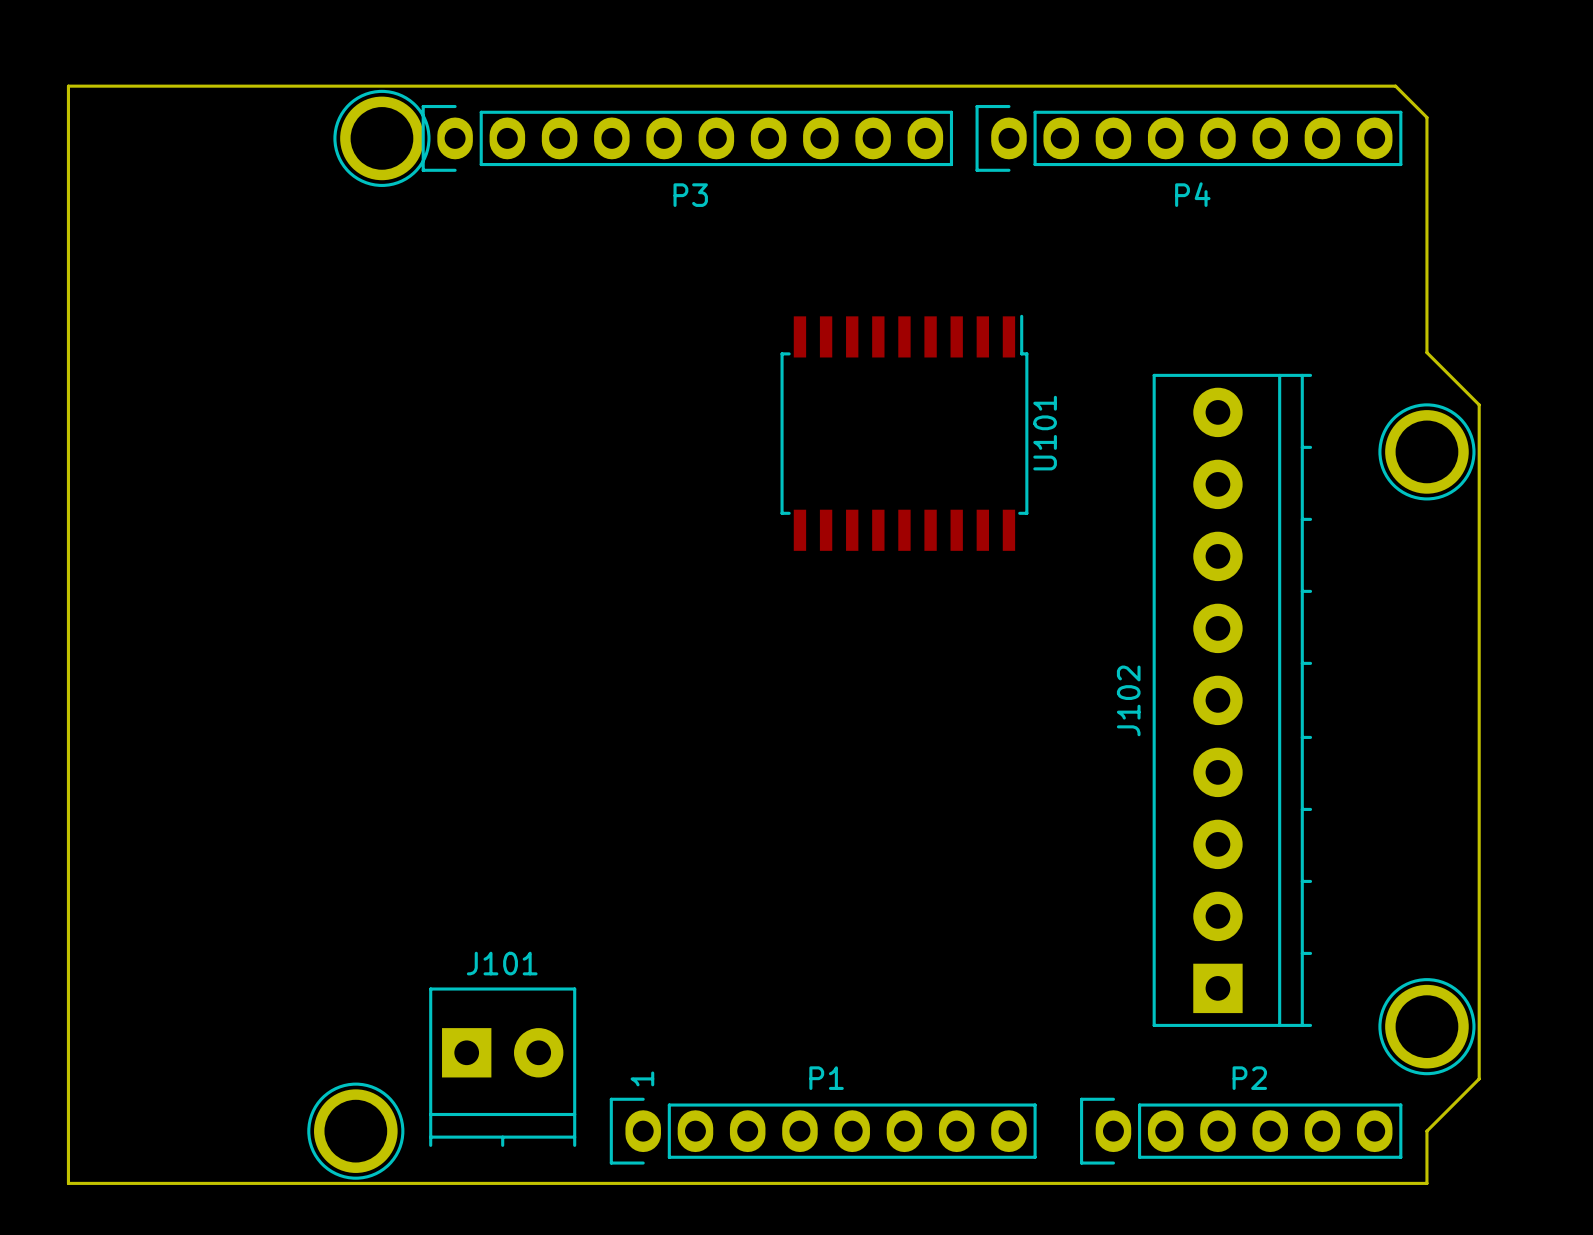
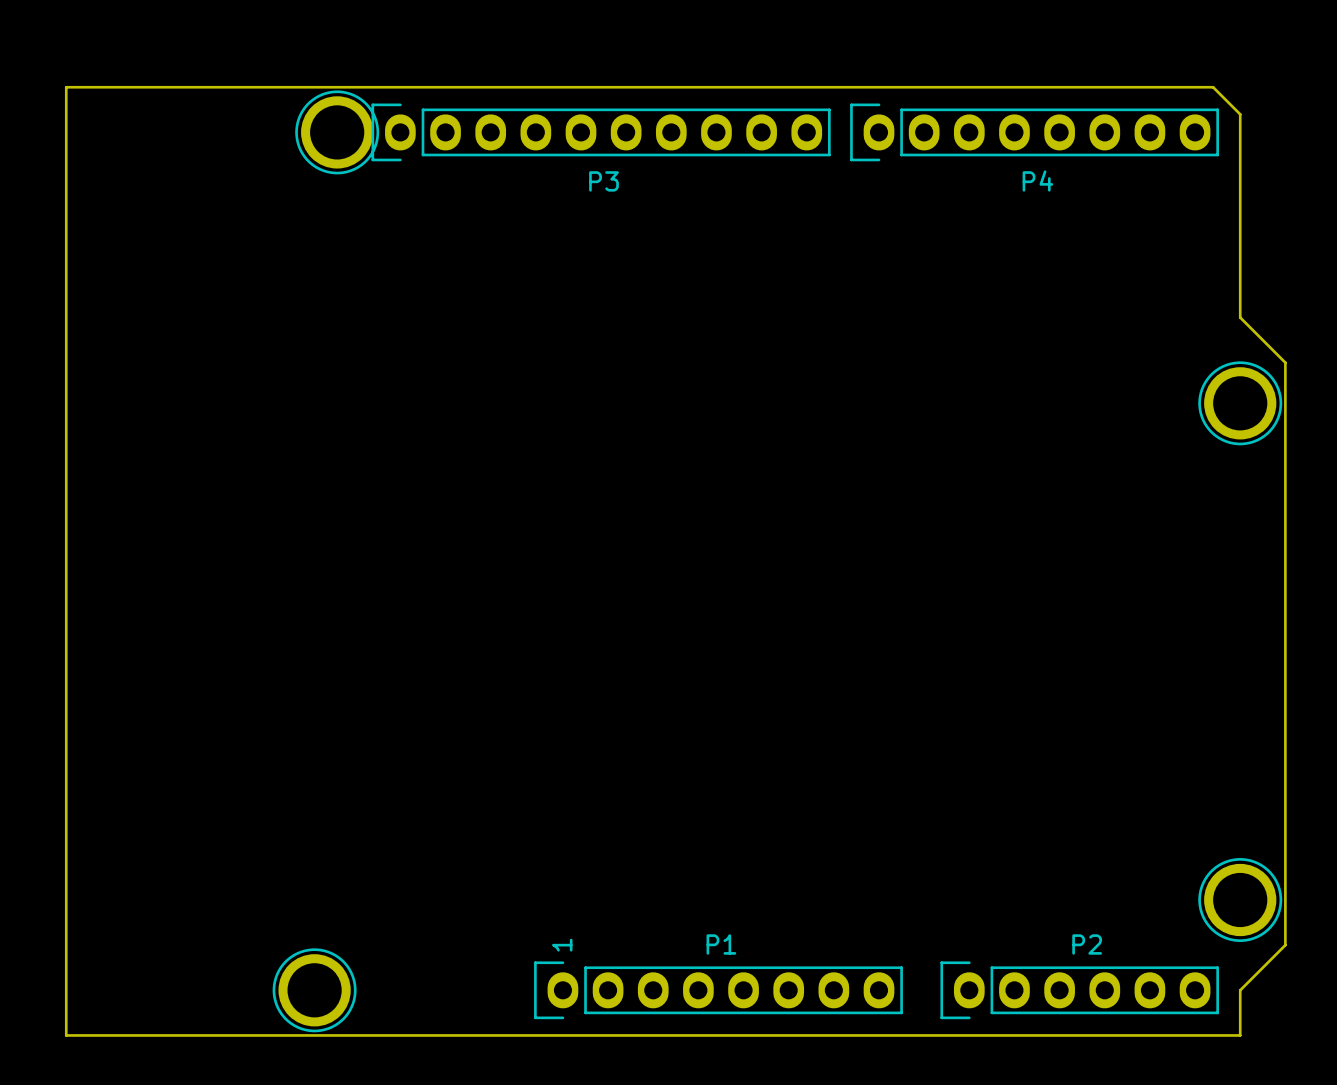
U101: (904, 432) -> none
J102: (1232, 700) -> none
J101: (502, 1067) -> none

